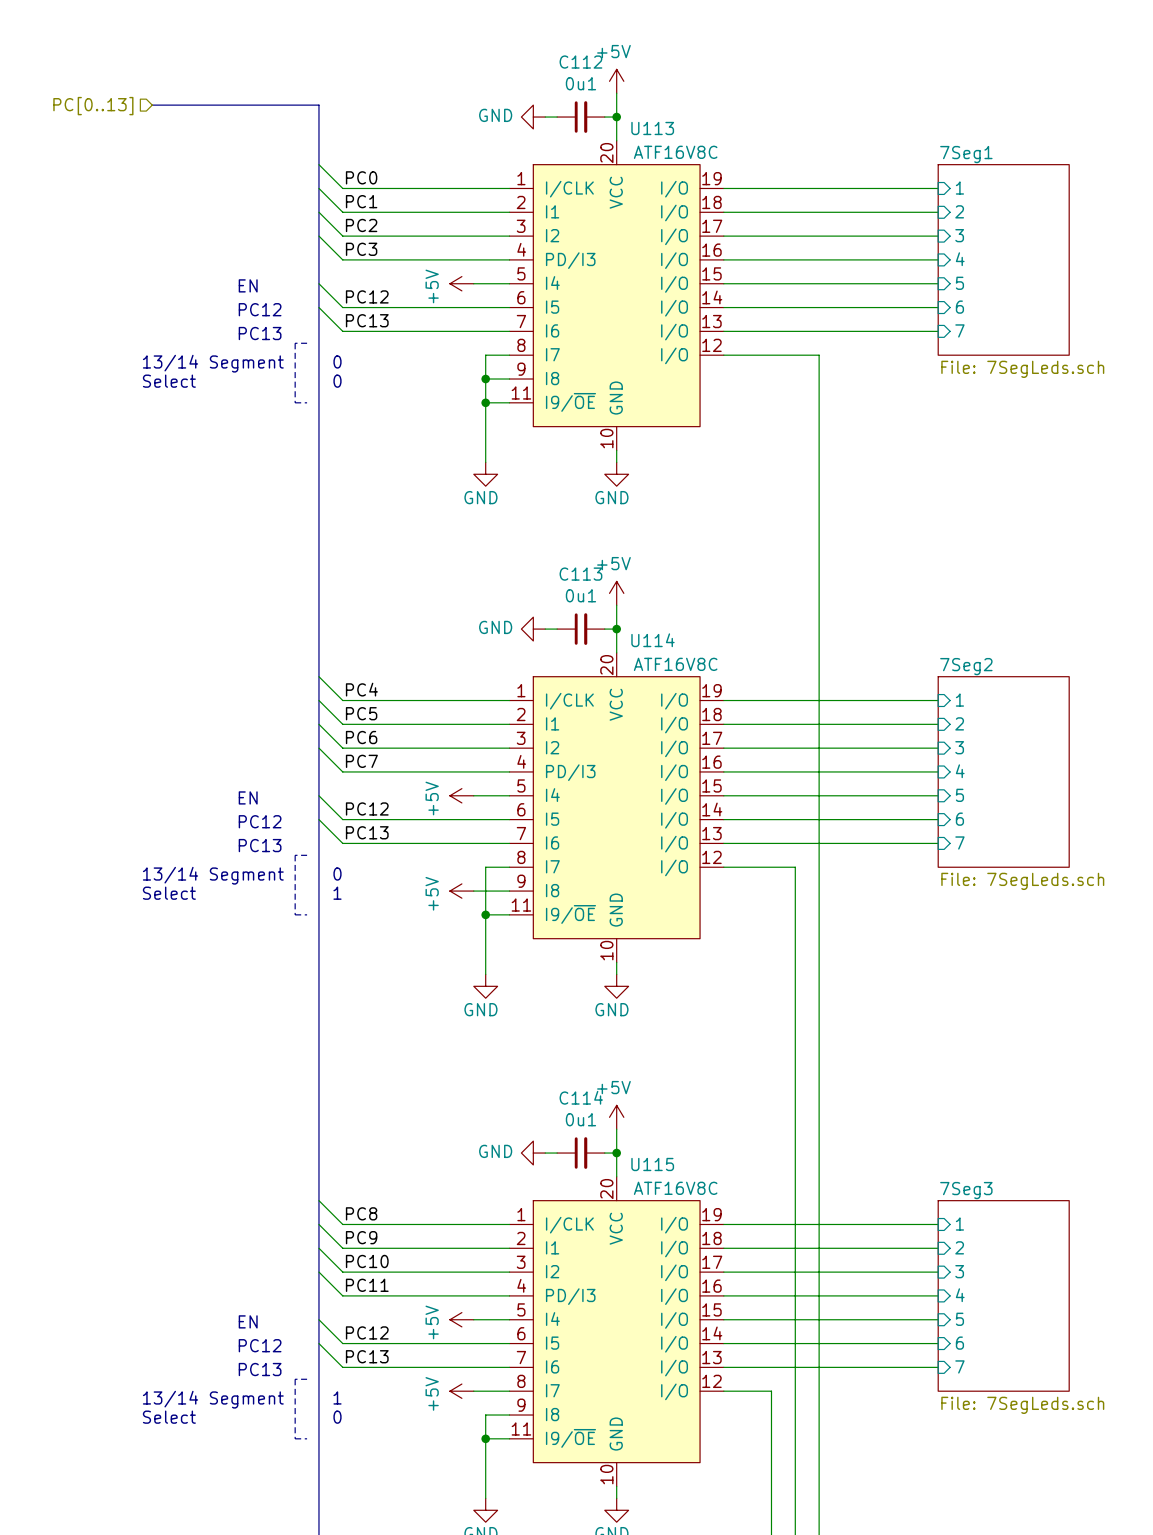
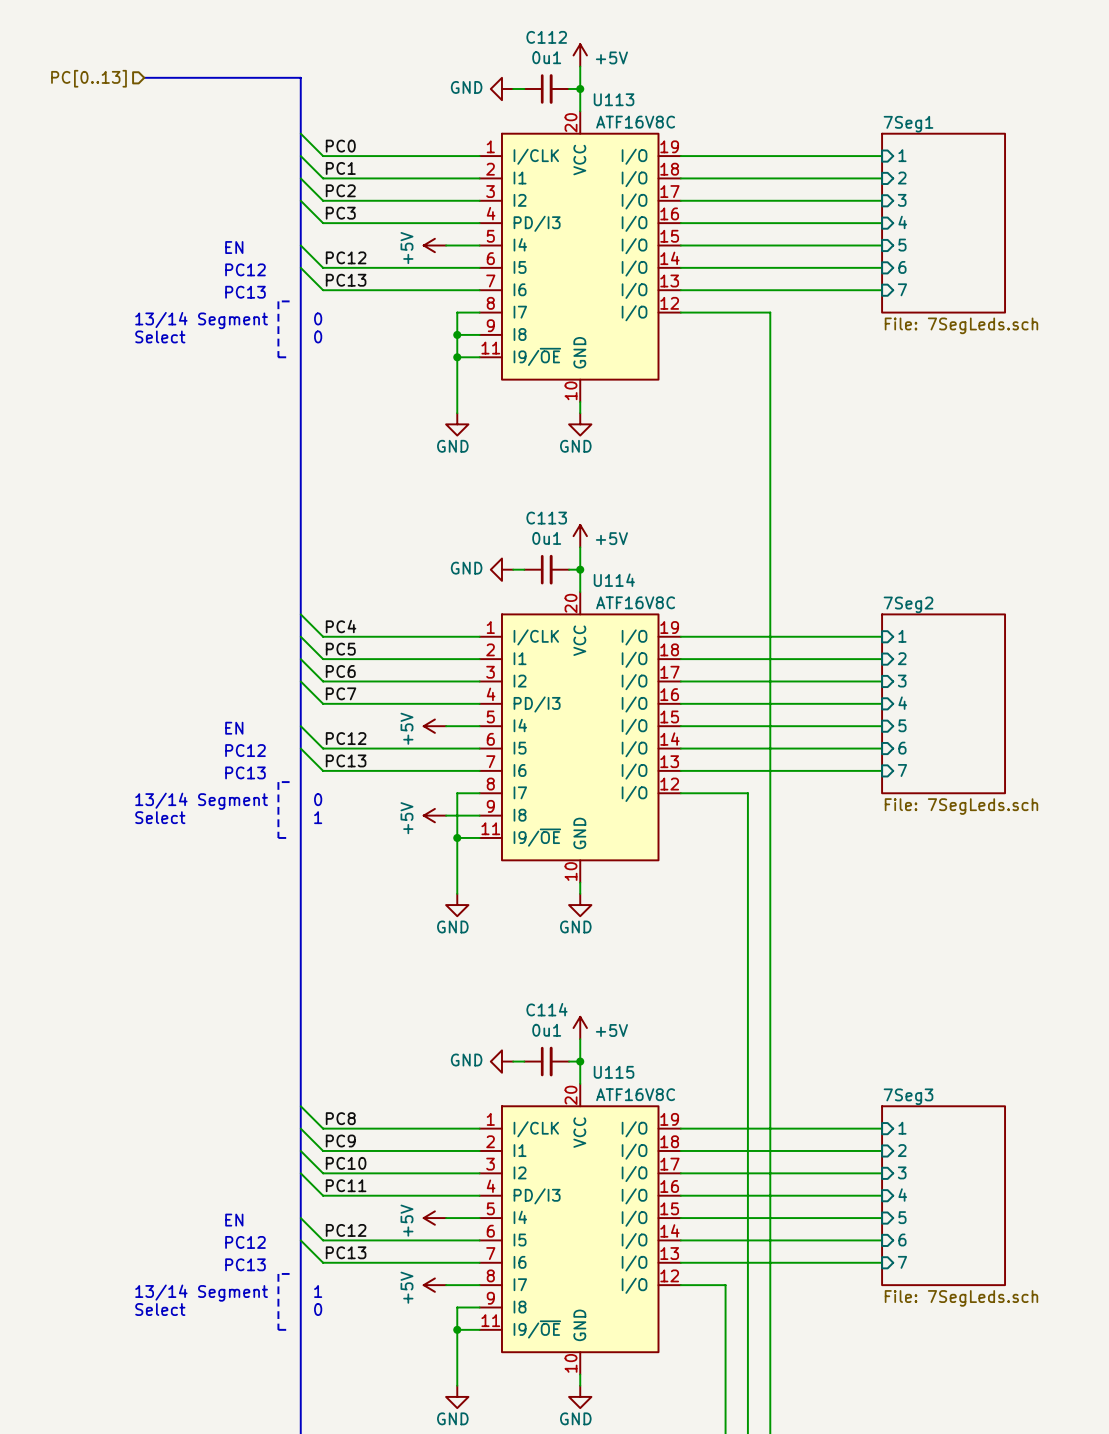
power symbol text position: +5V (613, 51) -> +5V (611, 57)
power symbol text position: +5V (613, 563) -> +5V (611, 538)
power symbol text position: +5V (613, 1087) -> +5V (611, 1030)

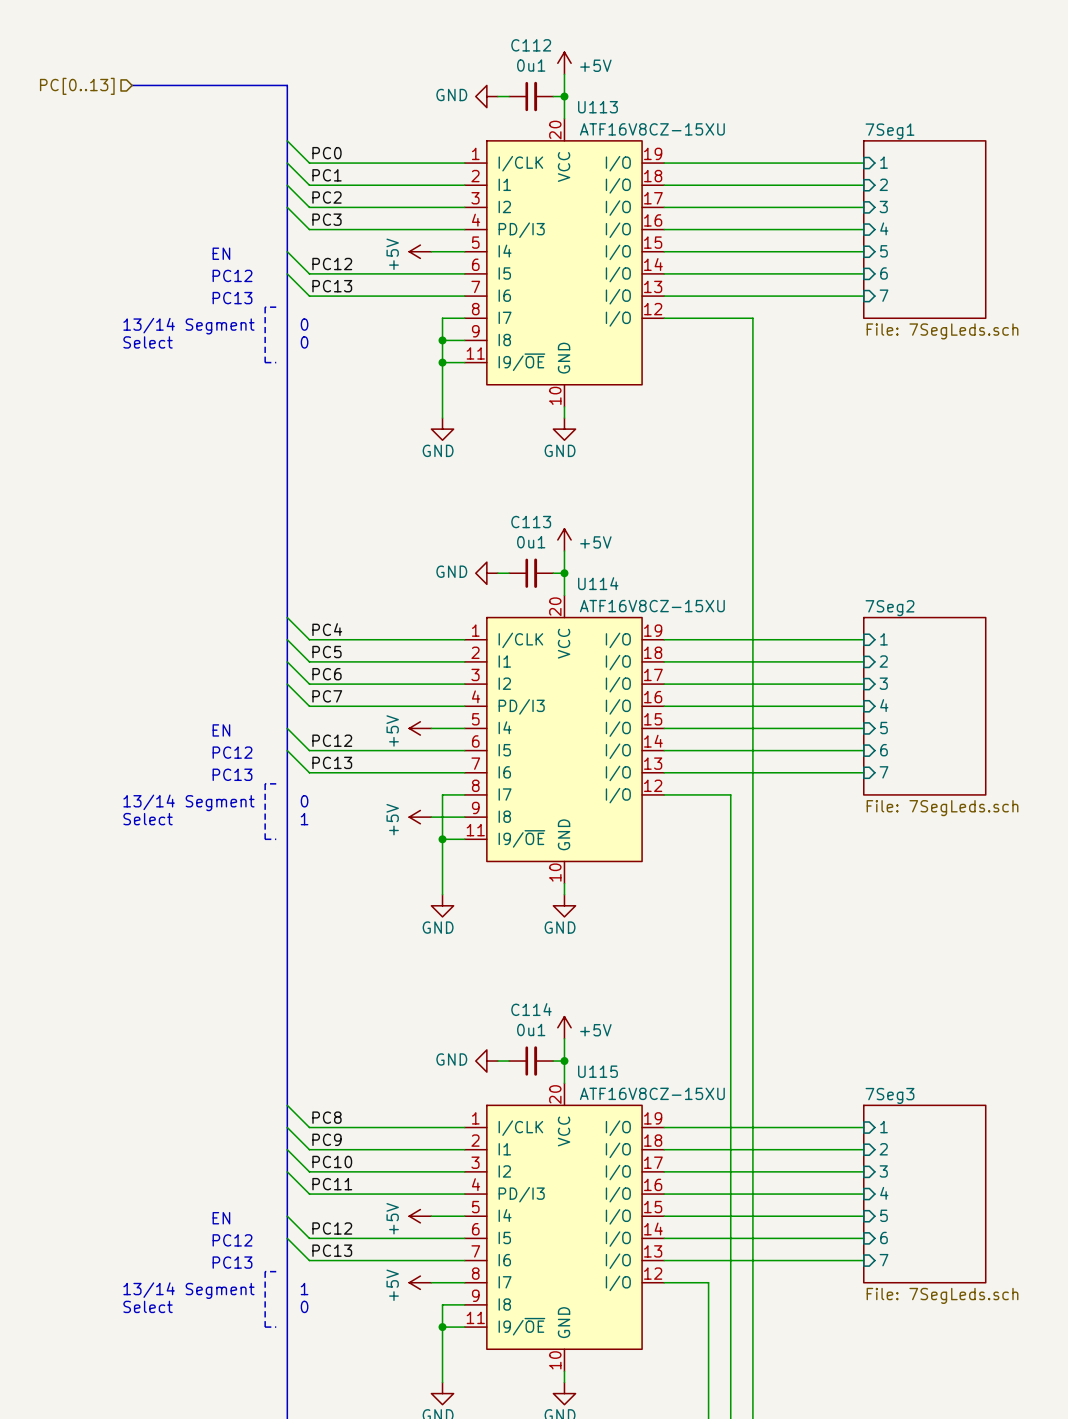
U113 value: ATF16V8C (635, 122) -> ATF16V8CZ-15XU (652, 129)
U114 value: ATF16V8C (635, 602) -> ATF16V8CZ-15XU (652, 606)
U115 value: ATF16V8C (635, 1094) -> ATF16V8CZ-15XU (652, 1093)

